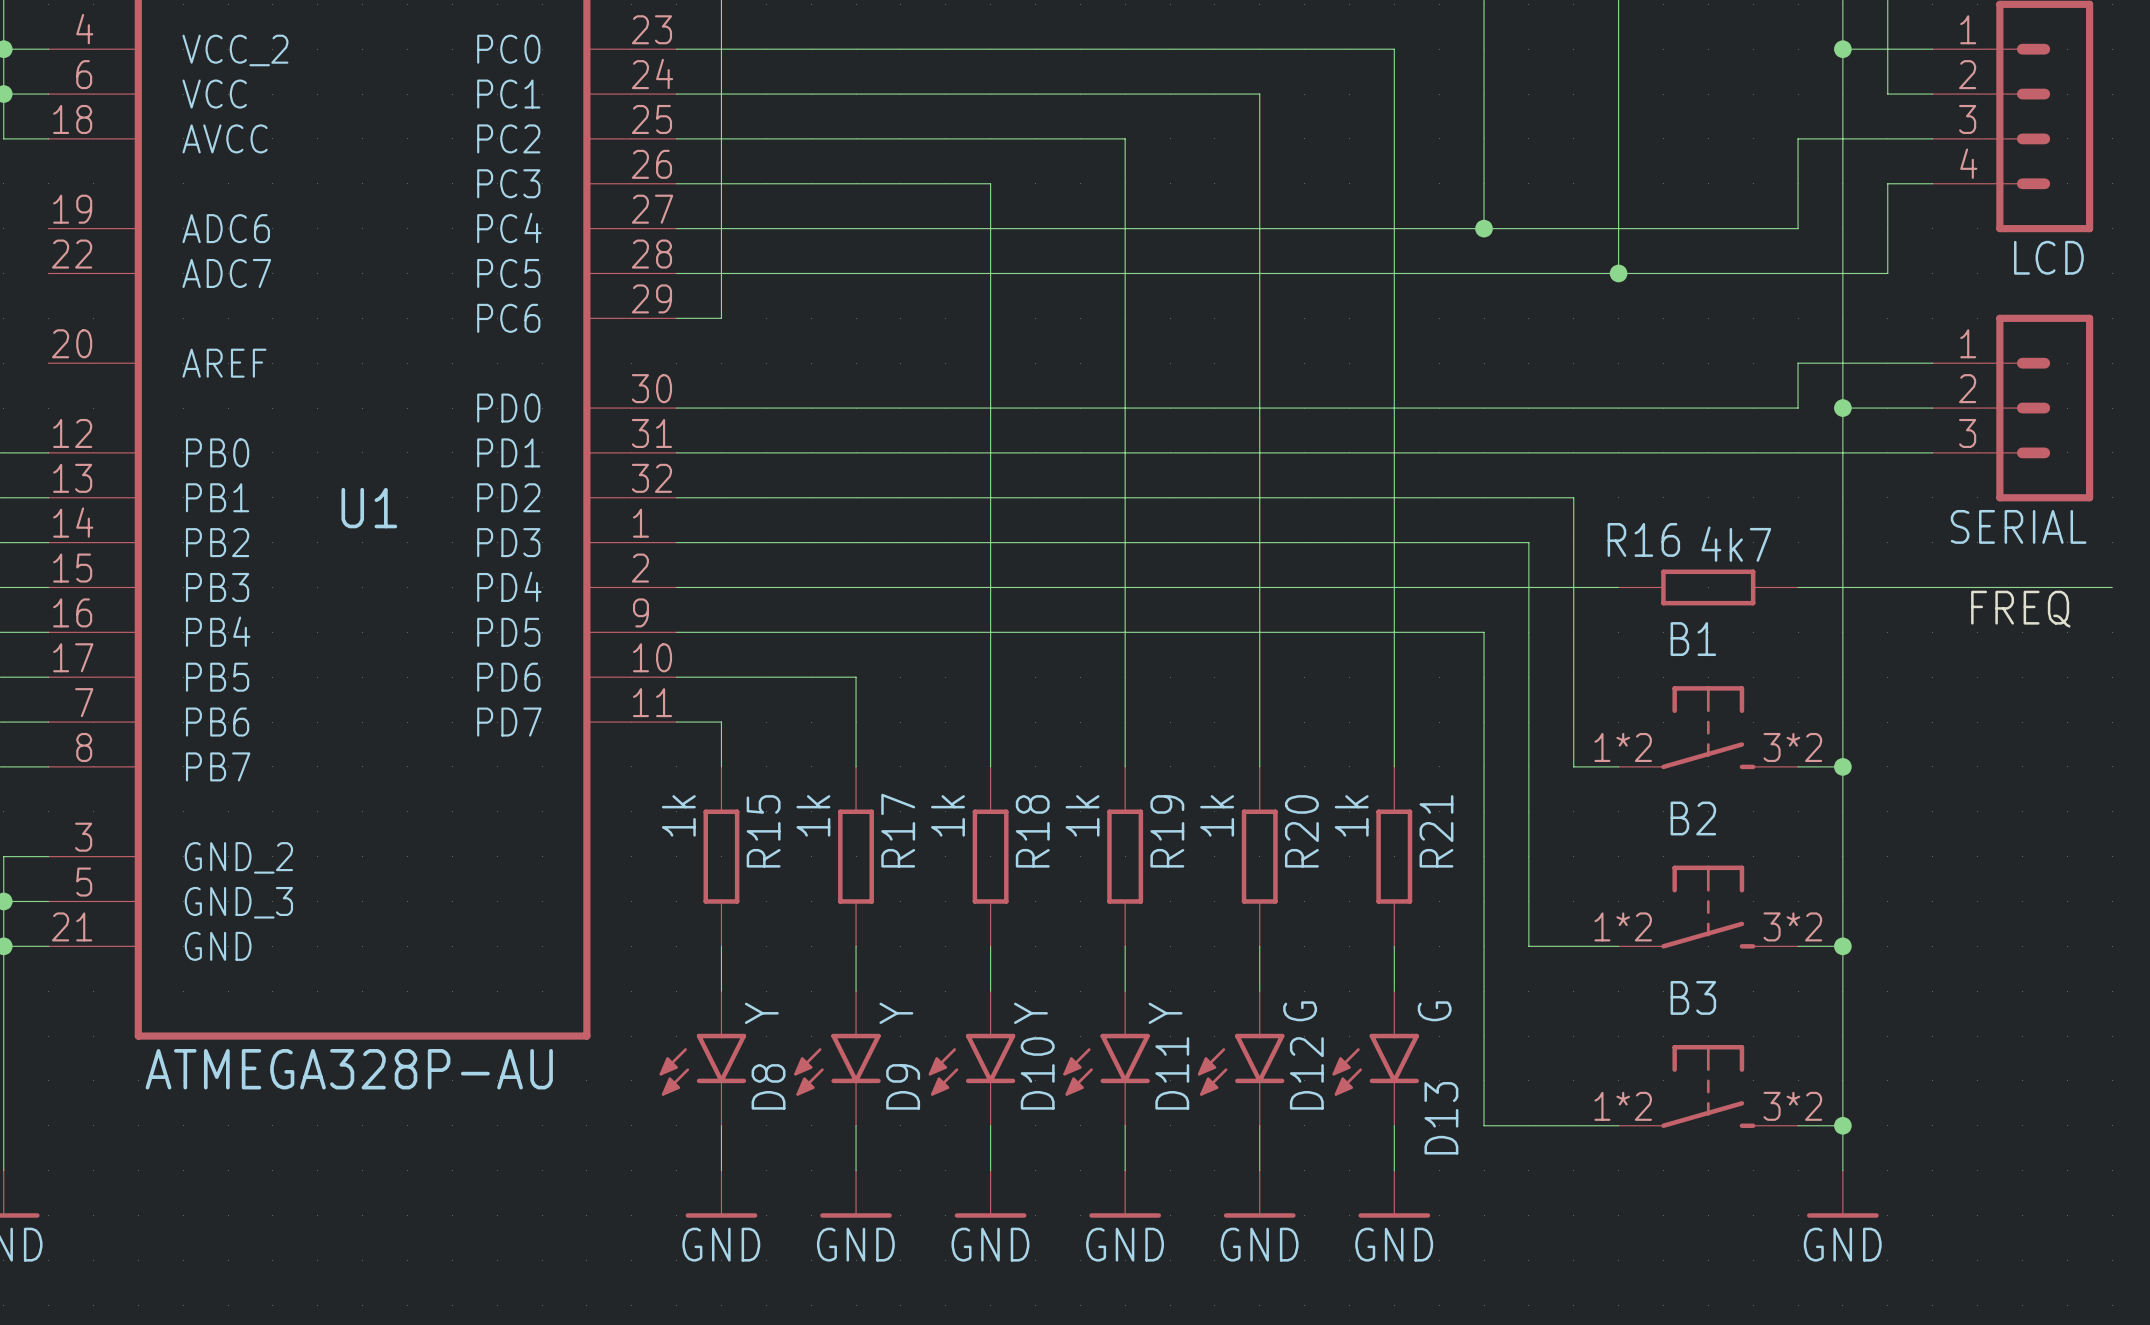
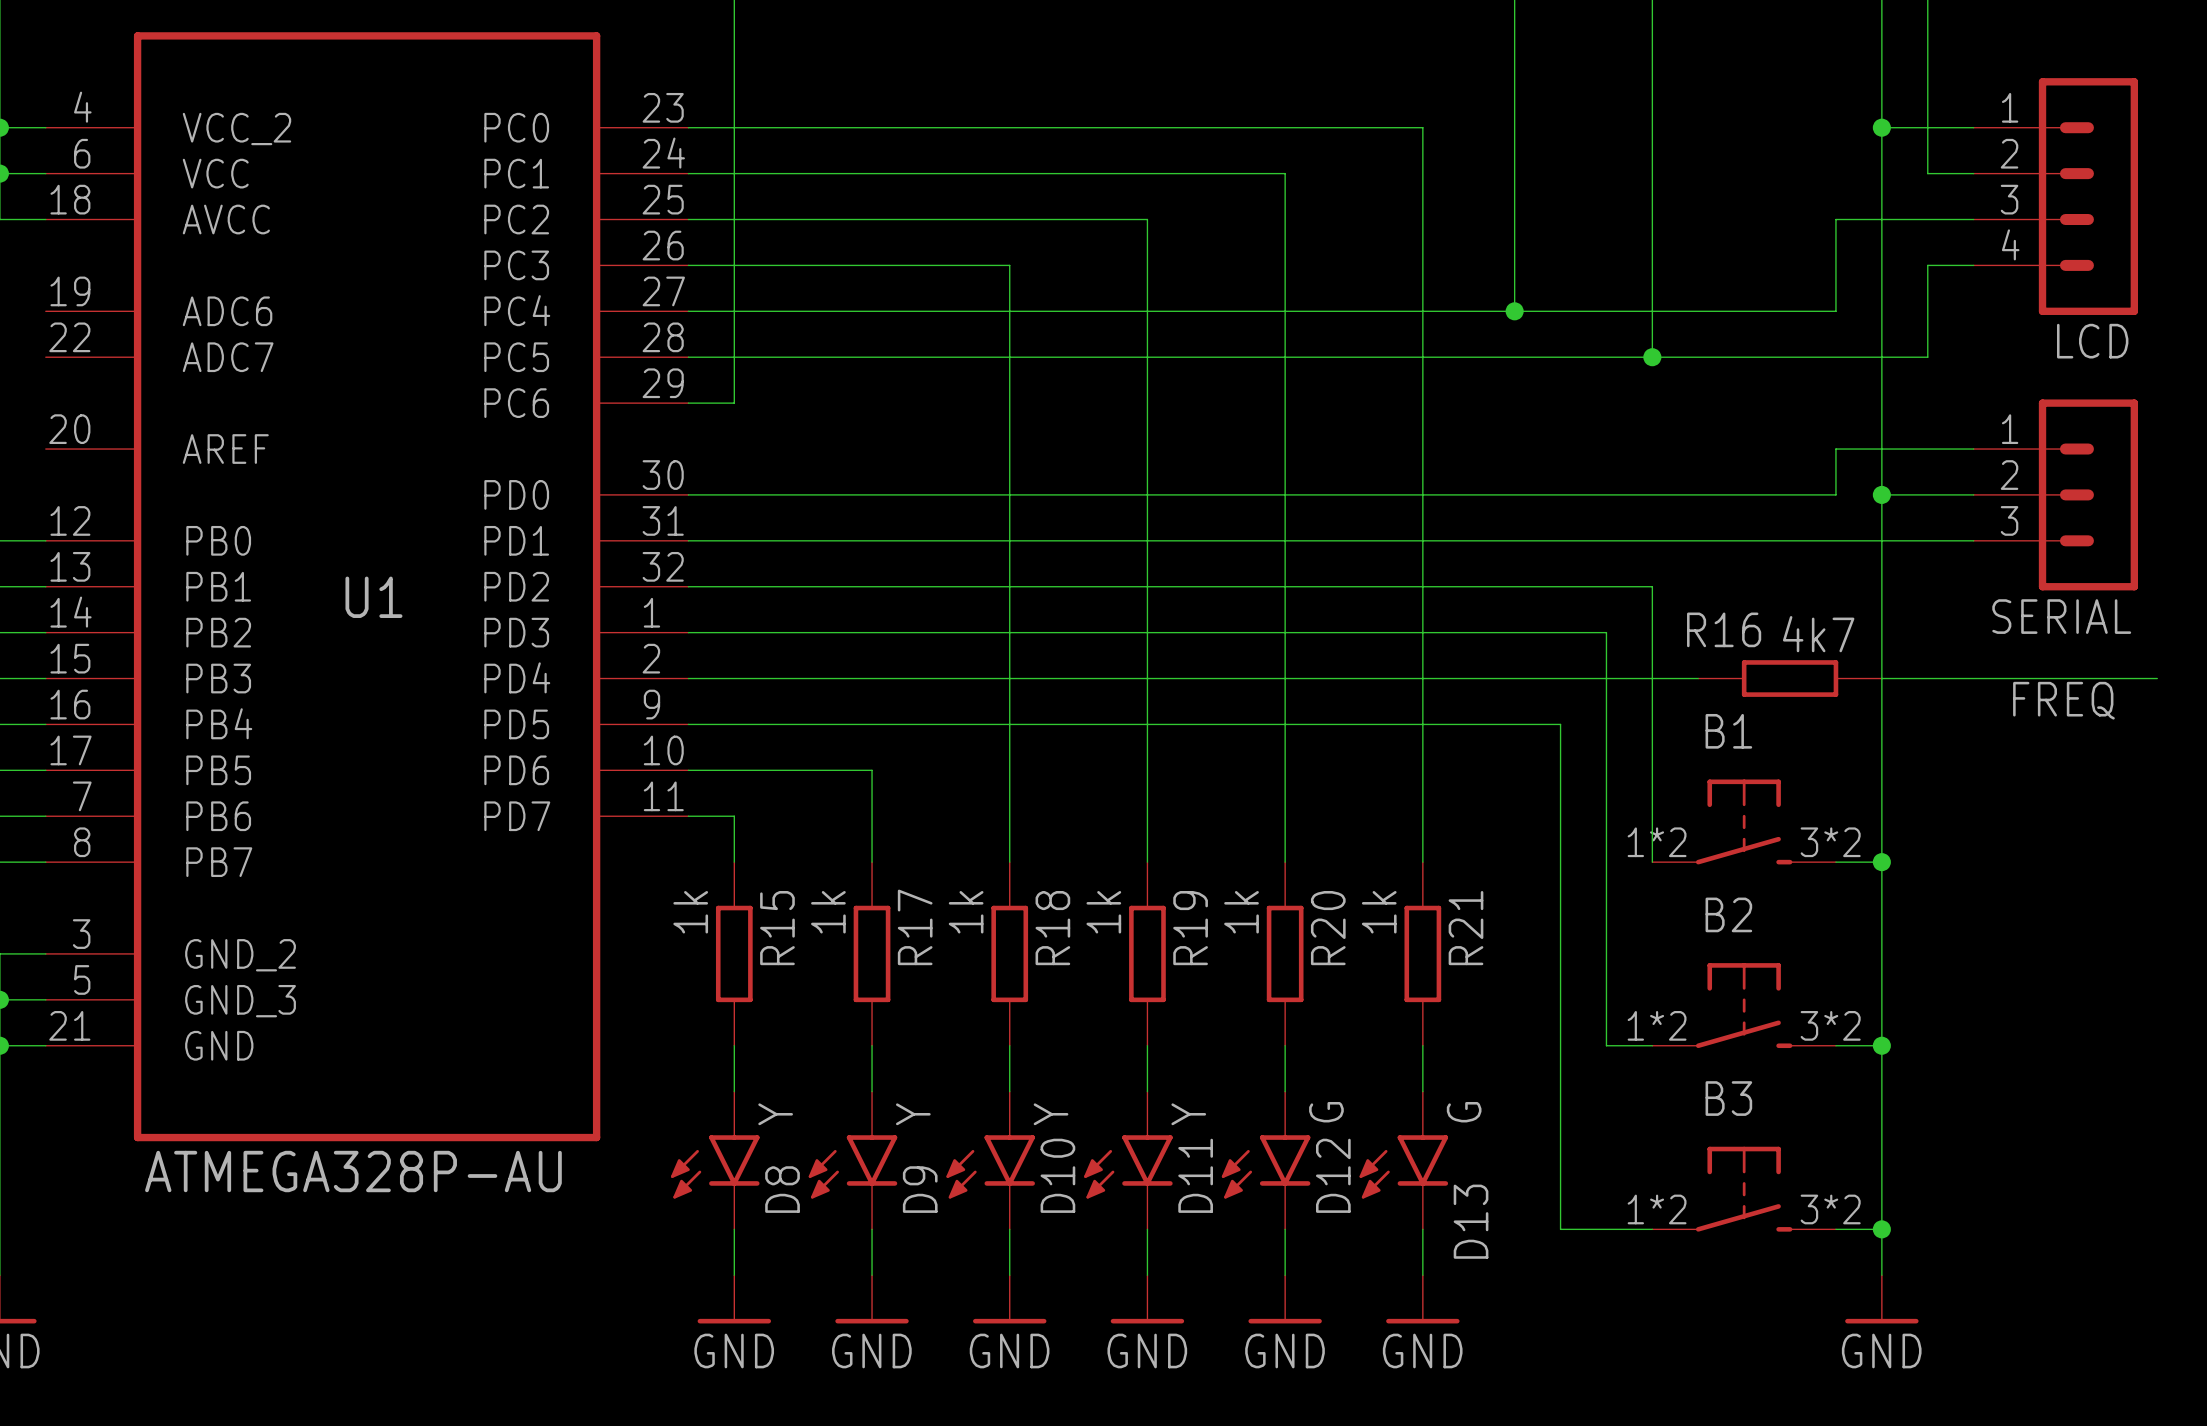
wire: (1573, 497) (1573, 542) -> (1560, 632) (1606, 632)
wire: none -> (1606, 586) (1652, 586) (1652, 862)
wire: (1528, 542) (1528, 632) -> (1514, 724) (1560, 724)
R16 position: (1708, 587) -> (1790, 678)
wire: (1484, 632) (1484, 1125) (1528, 1125) -> none
wire: (1573, 766) (1618, 766) -> (1606, 862) (1606, 1045)
wire: (1528, 946) (1573, 946) -> (1560, 1045) (1560, 1229)

